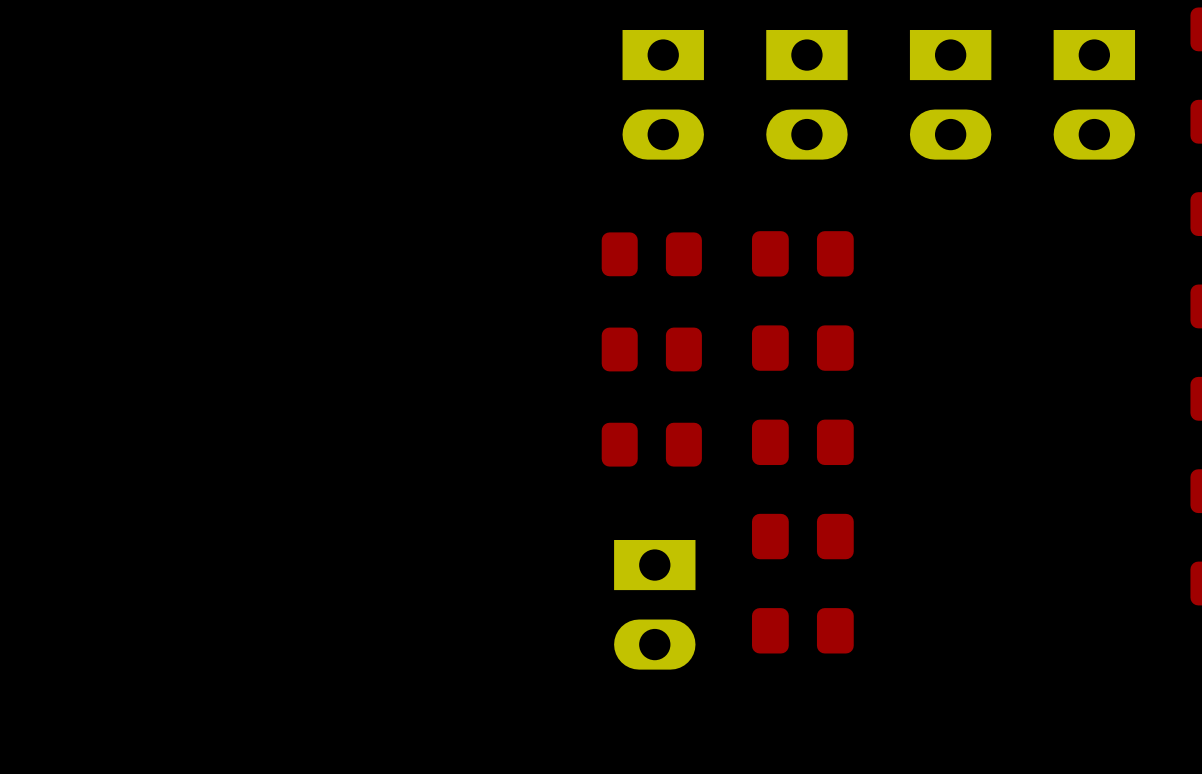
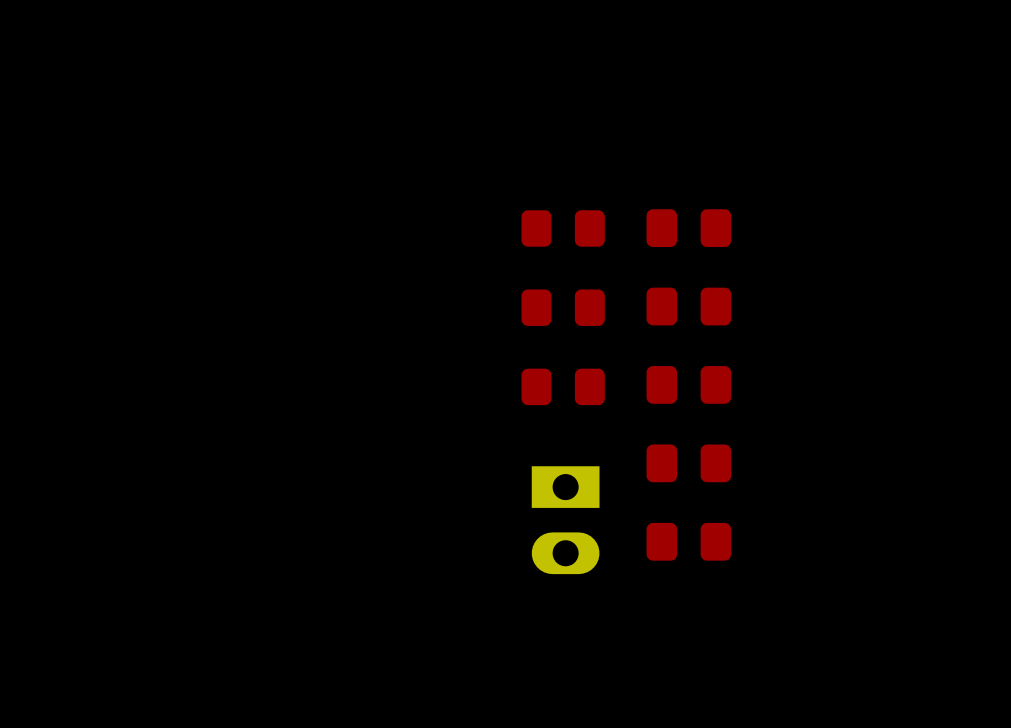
part: (663, 94) -> none
part: (806, 94) -> none
part: (950, 94) -> none
part: (1094, 94) -> none

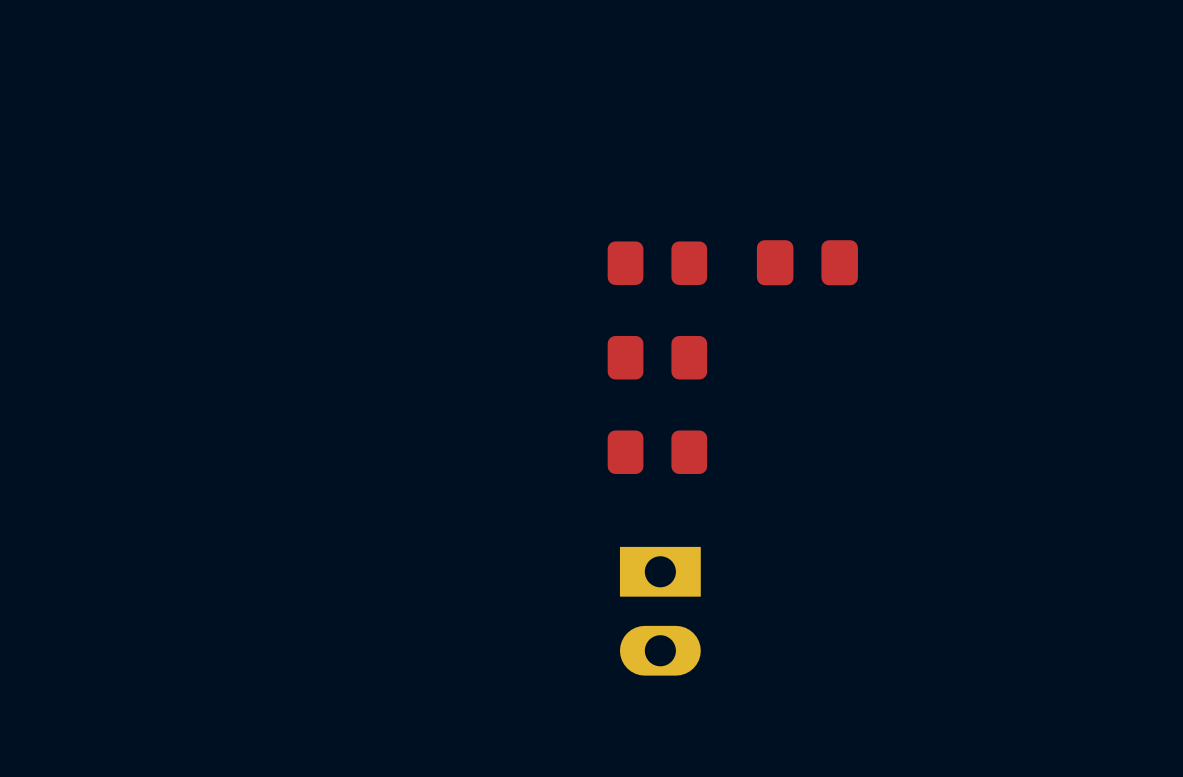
part: (688, 306) -> none
part: (688, 384) -> none
part: (688, 463) -> none
part: (688, 541) -> none

